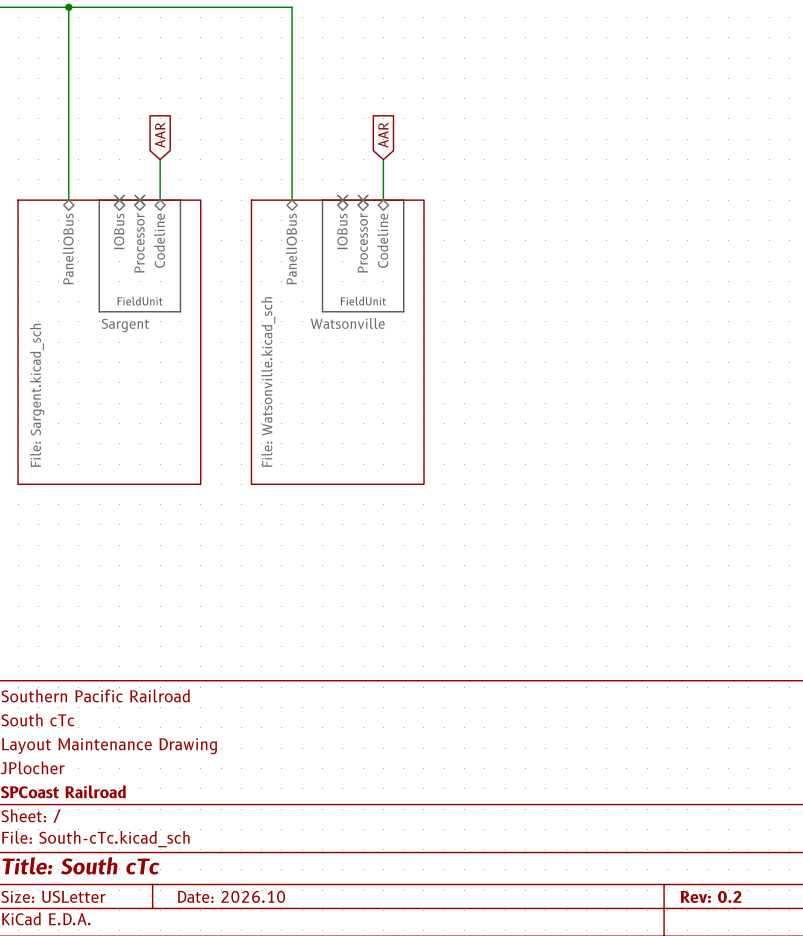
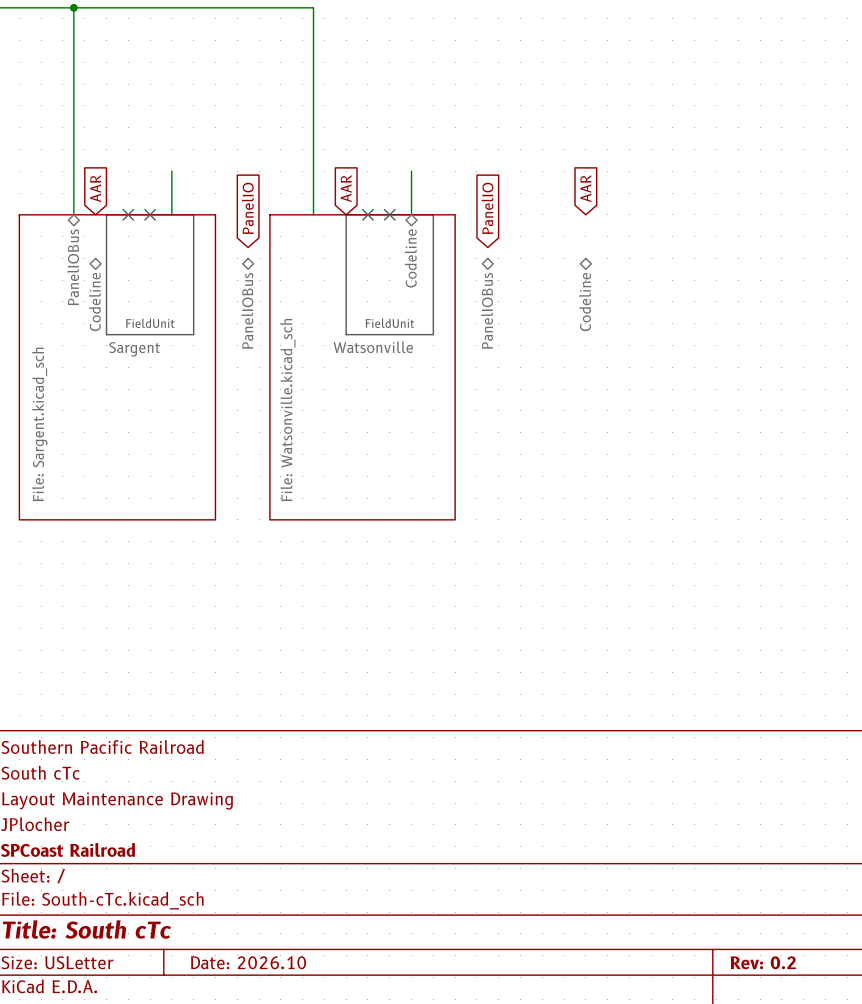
global label position: AAR (160, 135) -> AAR (95, 188)
global label position: AAR (383, 135) -> AAR (346, 188)
global label: none -> AAR (585, 188)
global label: none -> PanelIO (247, 208)
global label: none -> PanelIO (487, 208)
sheet pin: IOBus (119, 231) -> none
sheet pin: IOBus (342, 231) -> none
sheet pin position: Codeline (159, 240) -> Codeline (94, 302)
sheet pin: Processor (139, 242) -> none
sheet pin: Processor (362, 242) -> none
sheet pin position: PanelIOBus (291, 249) -> PanelIOBus (247, 310)
sheet pin: none -> Codeline (585, 302)
sheet pin: none -> PanelIOBus (487, 310)

